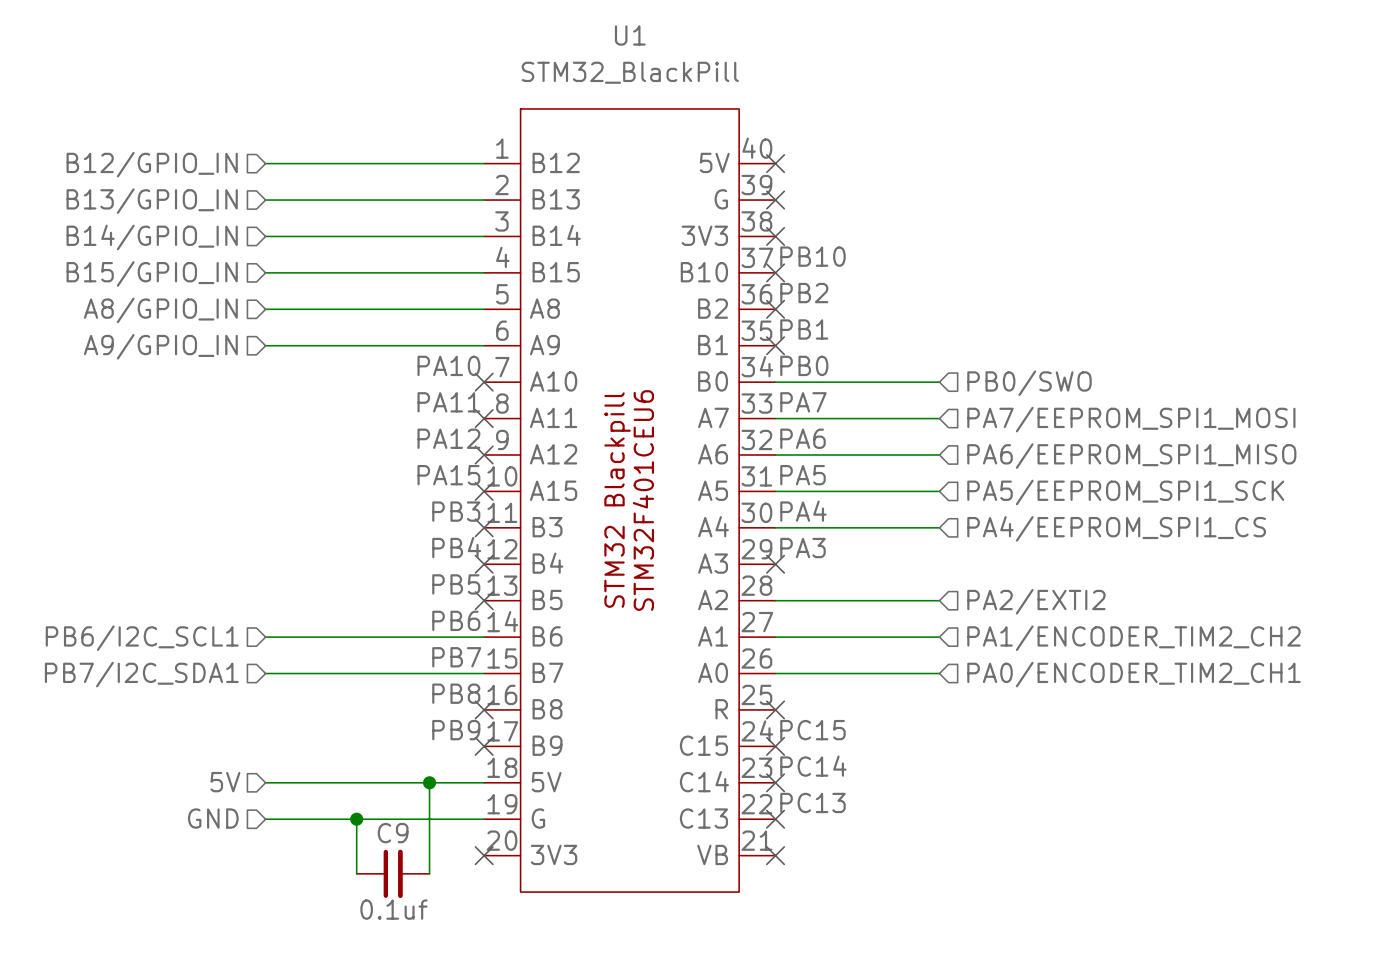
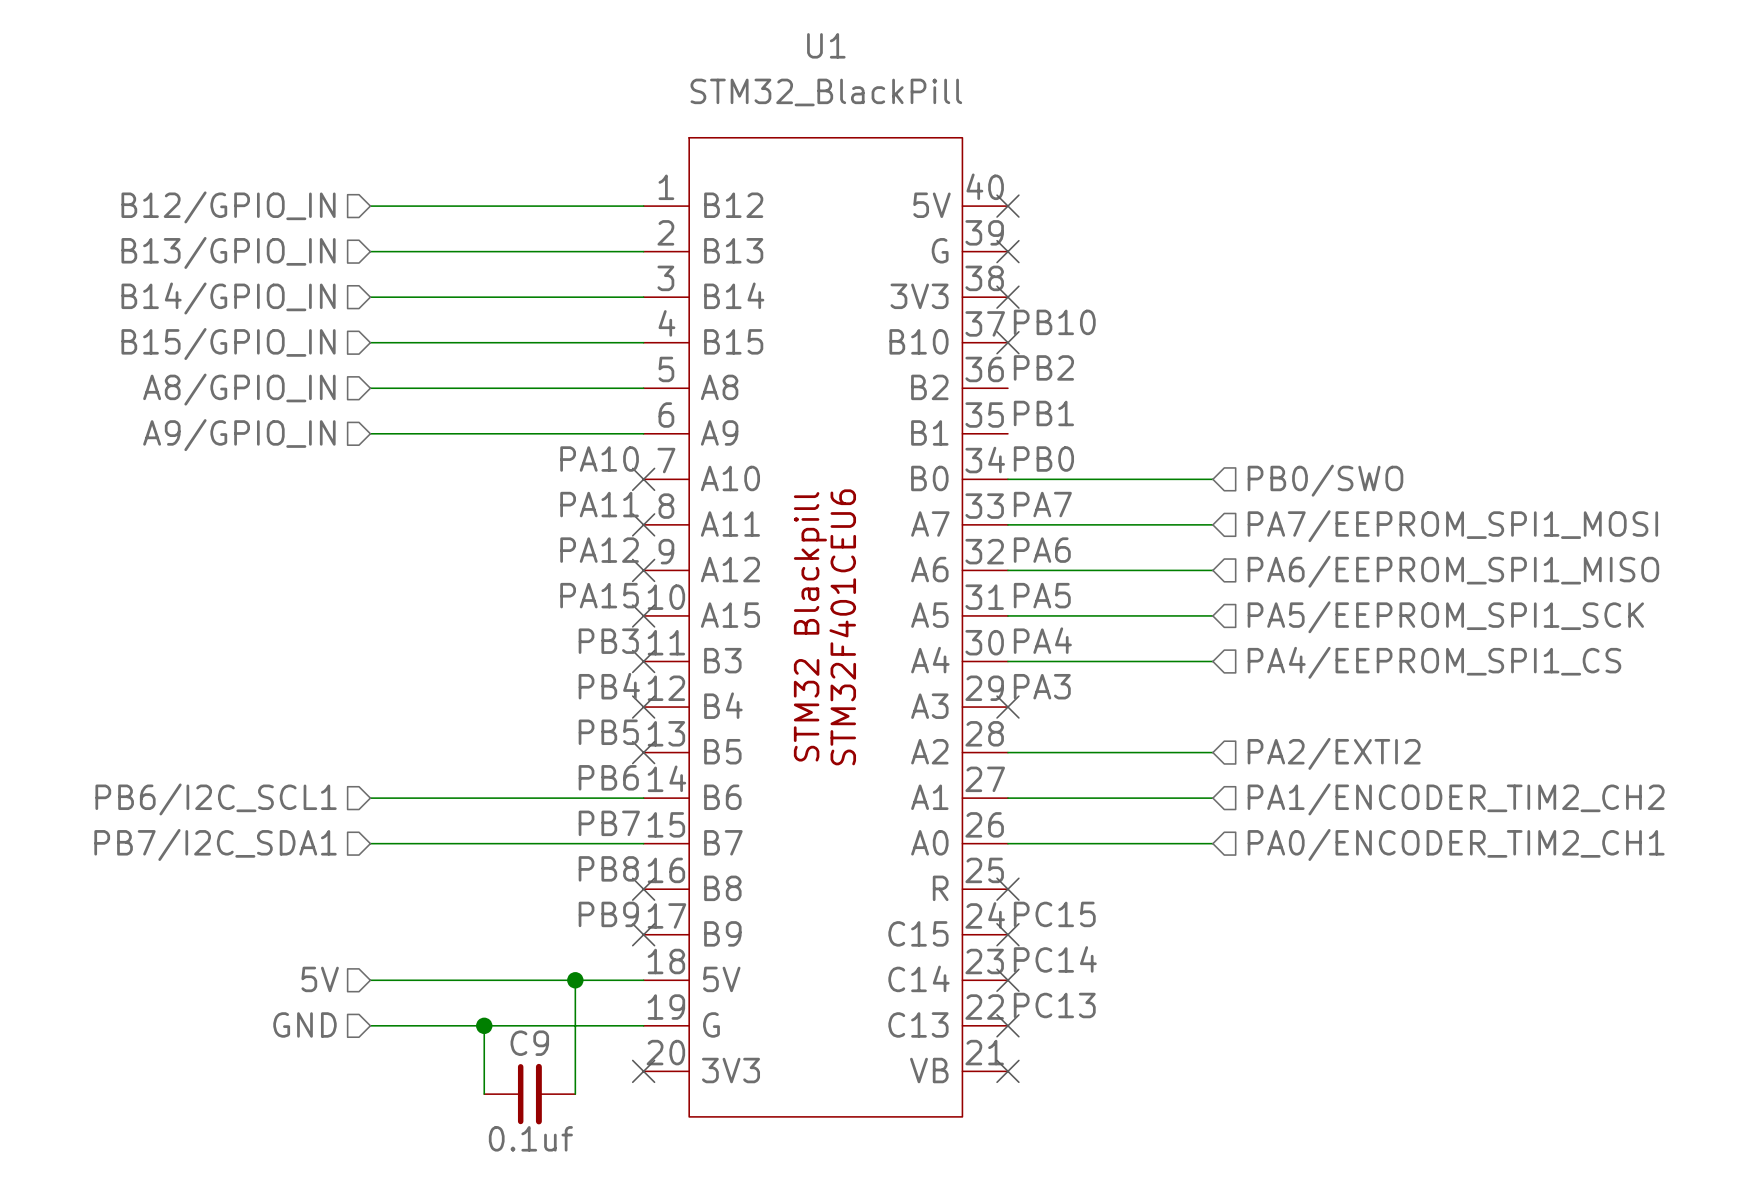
no-connect mark: (775, 309) -> none
no-connect mark: (775, 345) -> none

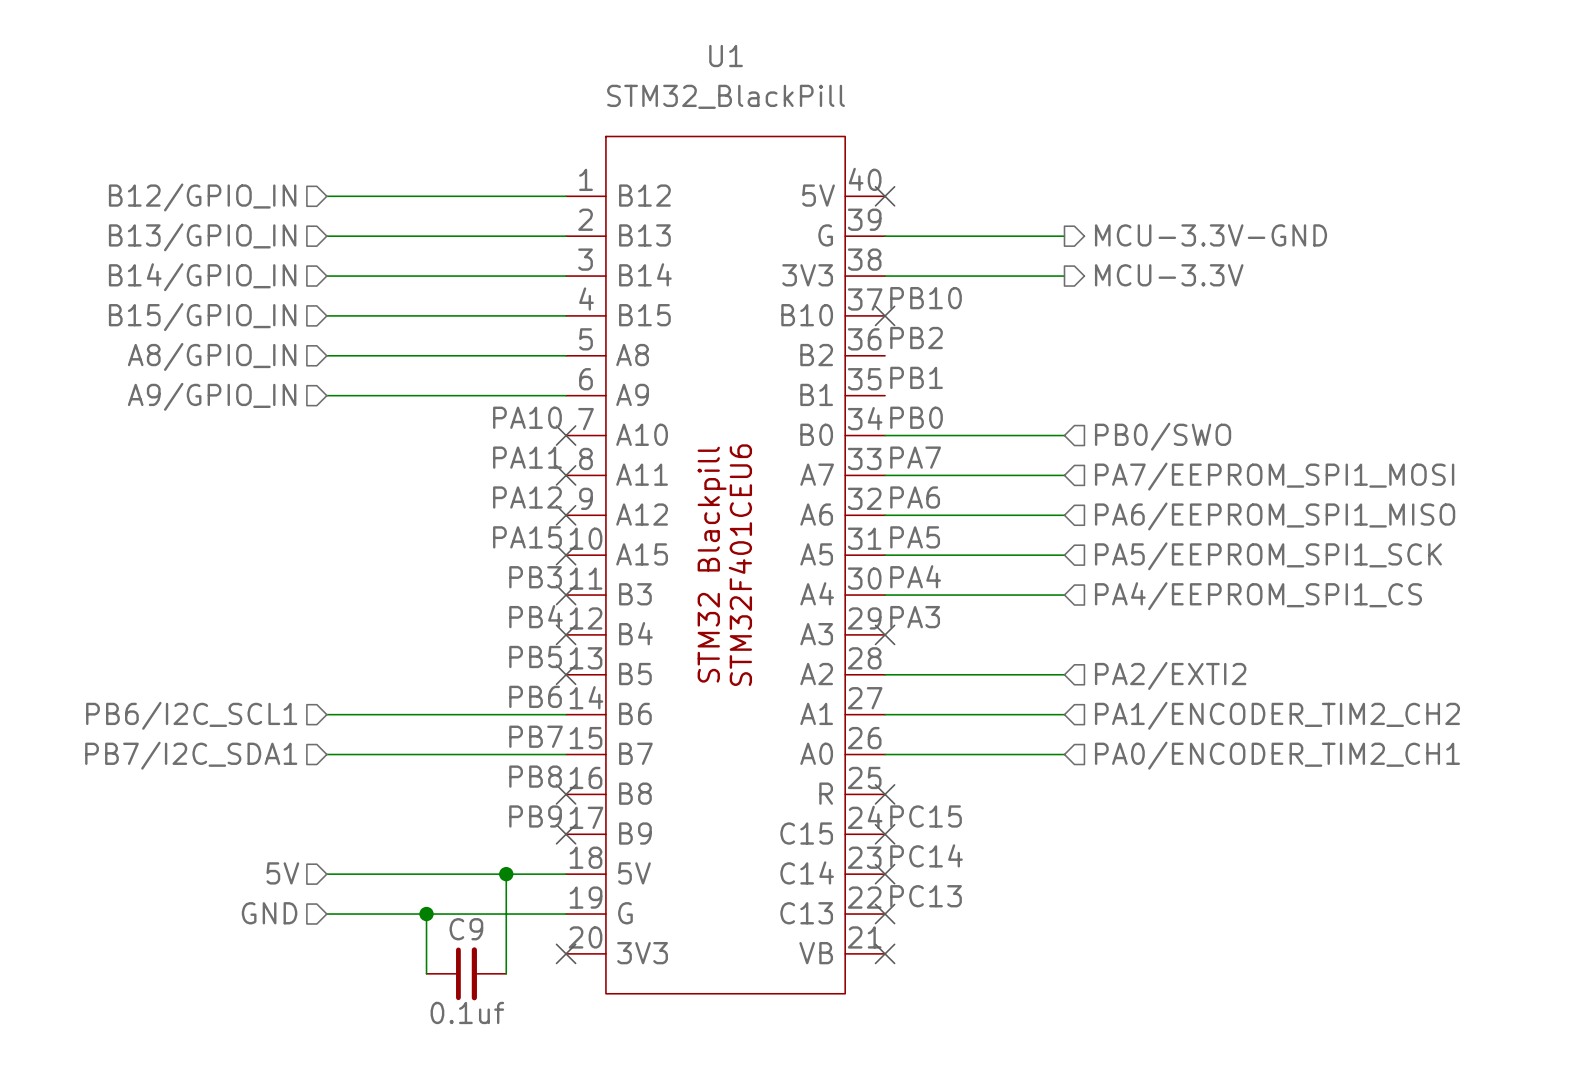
hierarchical label: none -> MCU-3.3V-GND (1211, 235)
wire: none -> (885, 236) (1064, 236)
no-connect mark: (1007, 251) -> none
hierarchical label: none -> MCU-3.3V (1169, 275)
wire: none -> (885, 276) (1064, 276)
no-connect mark: (1007, 297) -> none

